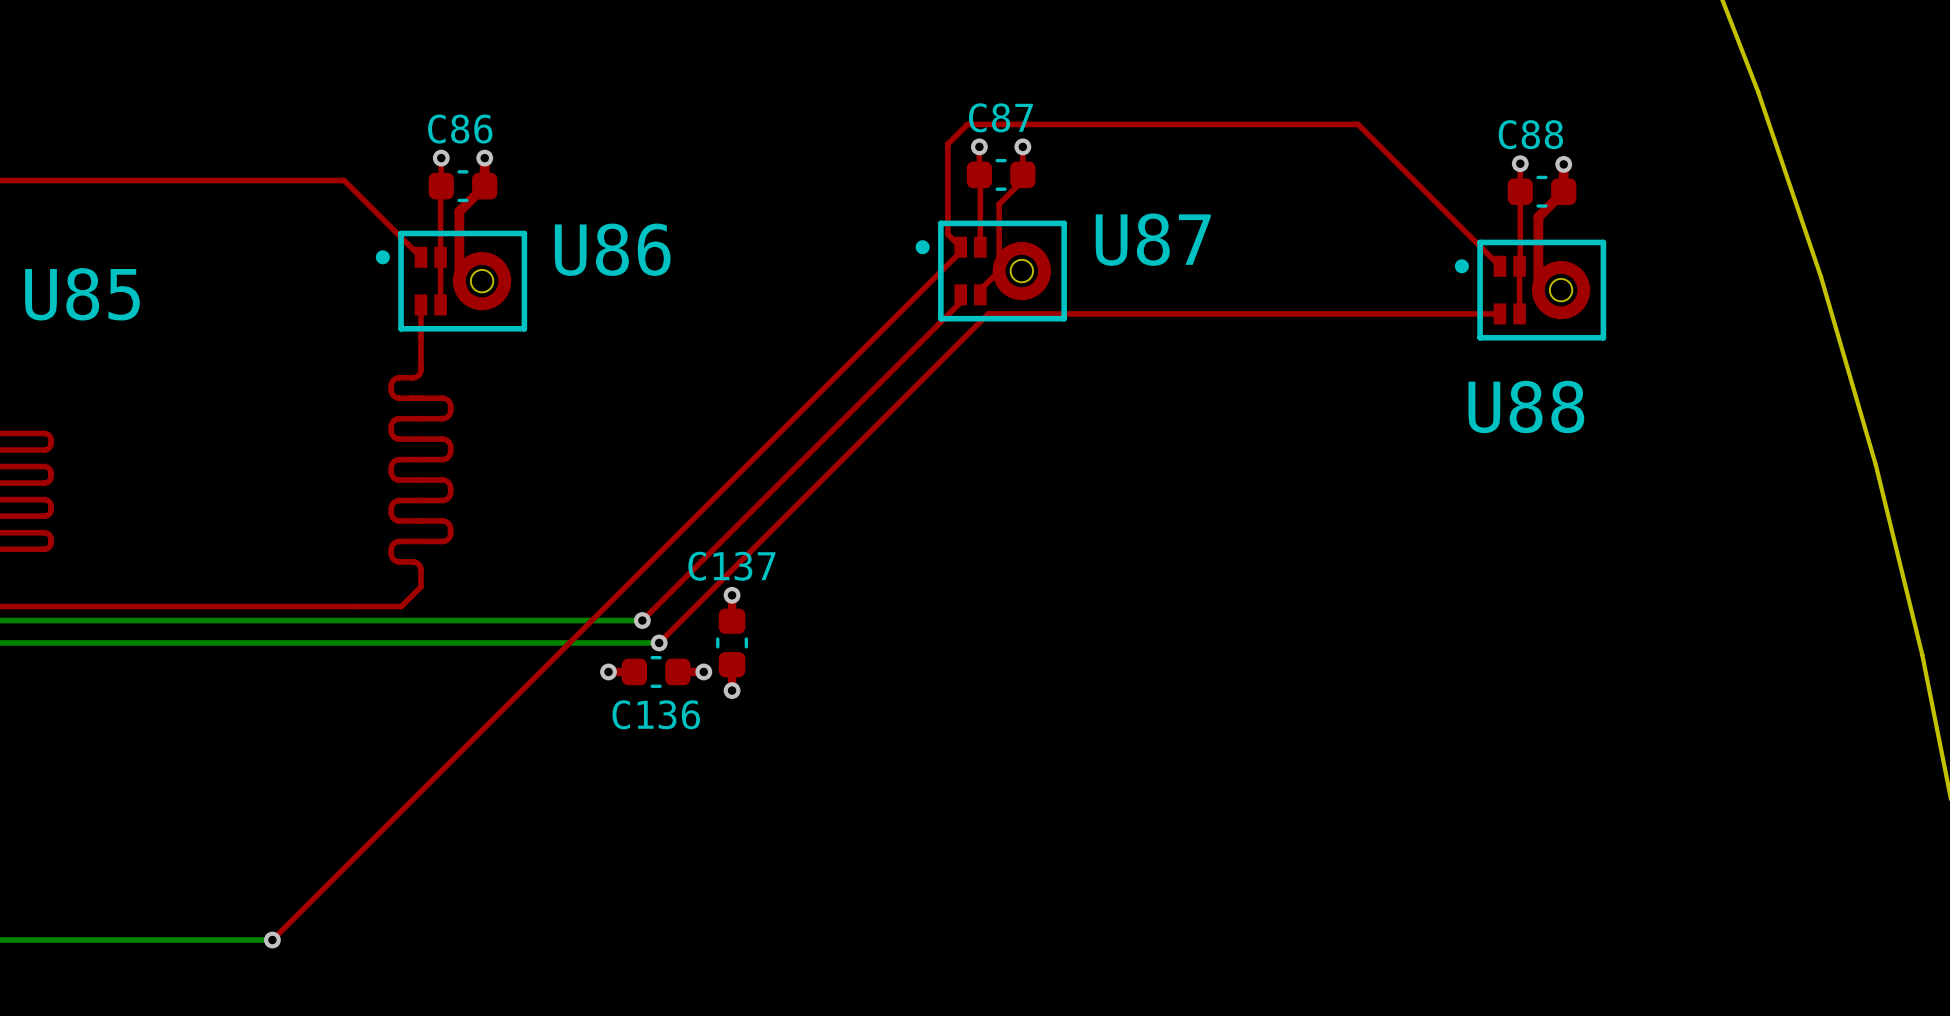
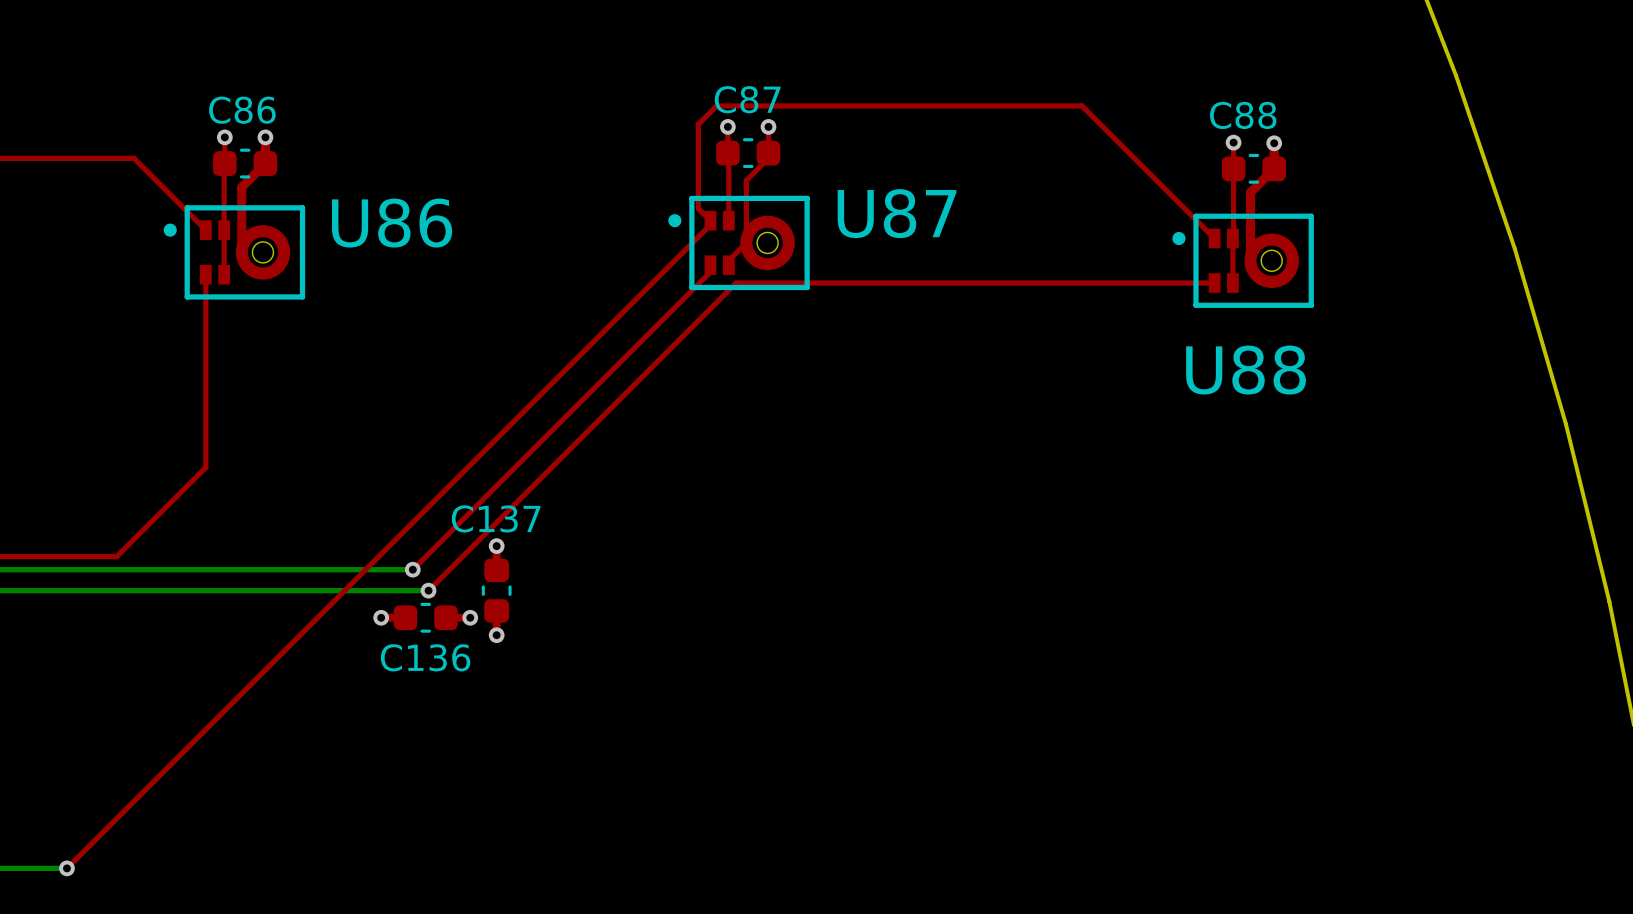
top track: (420, 369) (415, 377) (394, 379) (391, 384) (392, 394) (398, 398) (444, 398) (450, 403) (450, 413) (443, 418) (396, 419) (391, 424) (391, 434) (398, 439) (444, 439) (450, 444) (450, 453) (443, 459) (396, 460) (391, 464) (391, 473) (398, 479) (445, 480) (450, 485) (450, 494) (443, 500) (397, 500) (391, 505) (391, 513) (393, 518) (398, 520) (445, 521) (450, 527) (450, 536) (443, 541) (399, 541) (392, 544) (391, 554) (394, 560) (414, 562) (420, 569) (420, 586) (401, 606) (325, 606) -> (205, 335) (205, 467) (116, 556)

